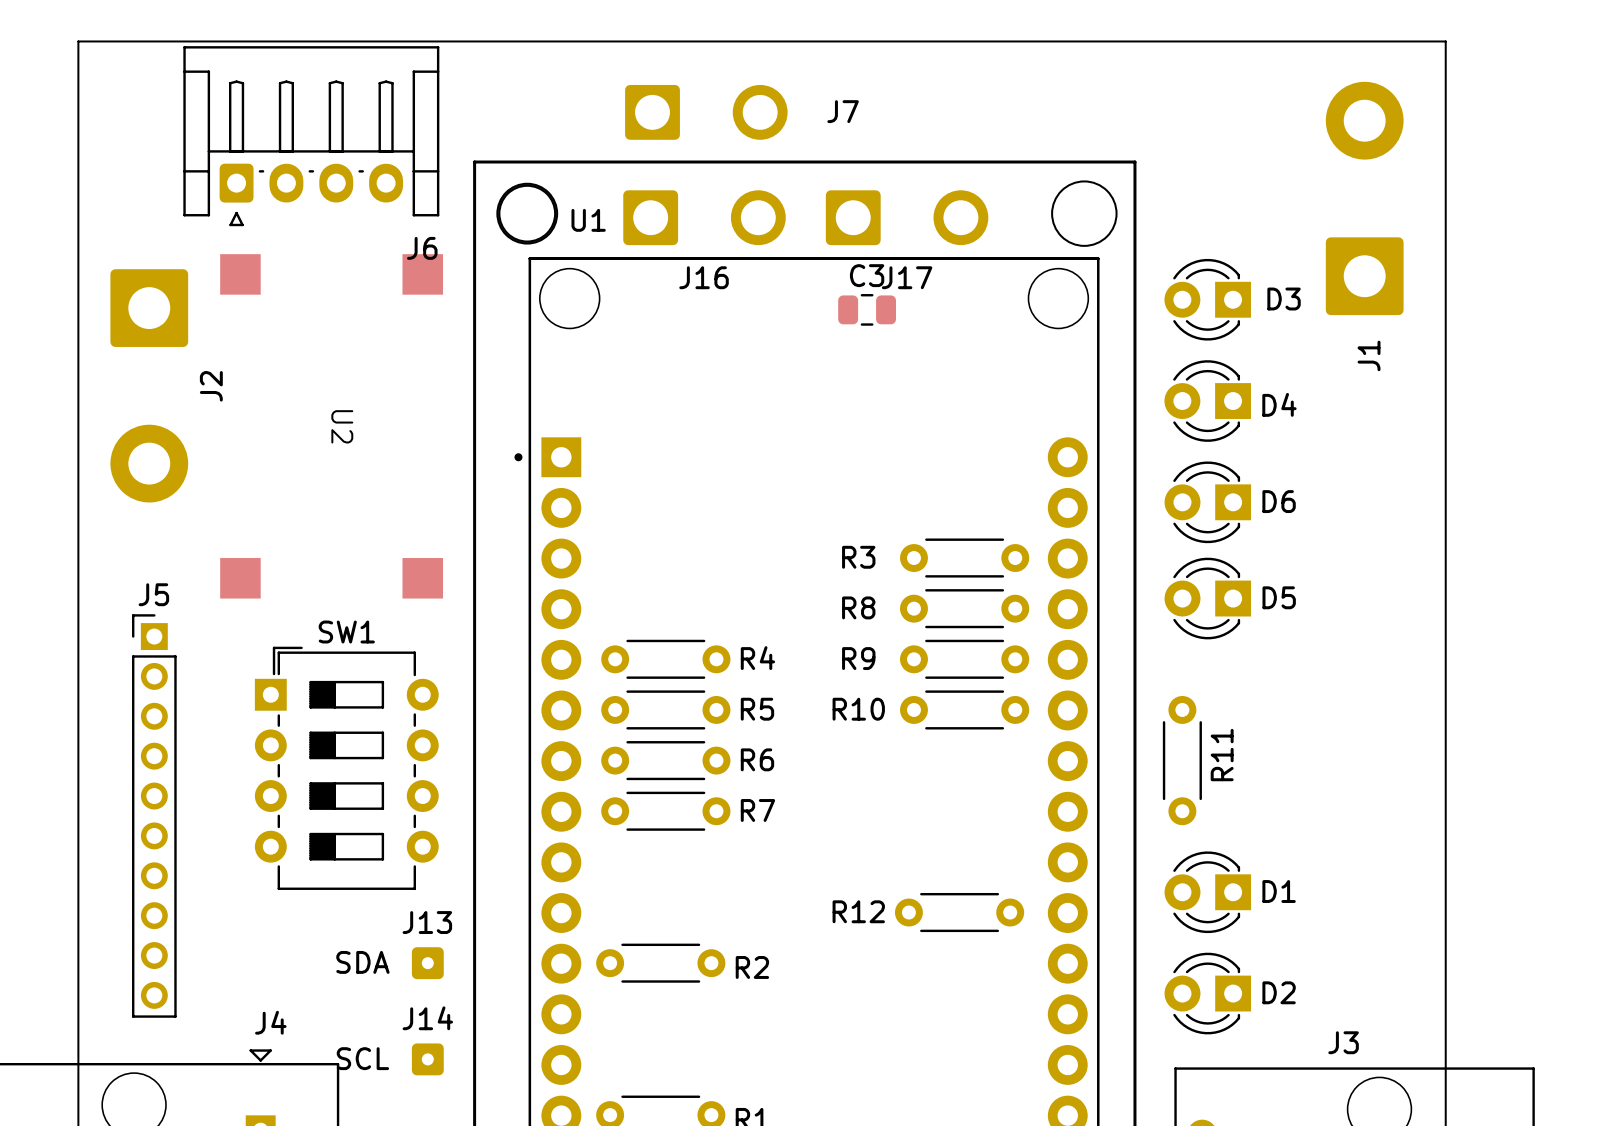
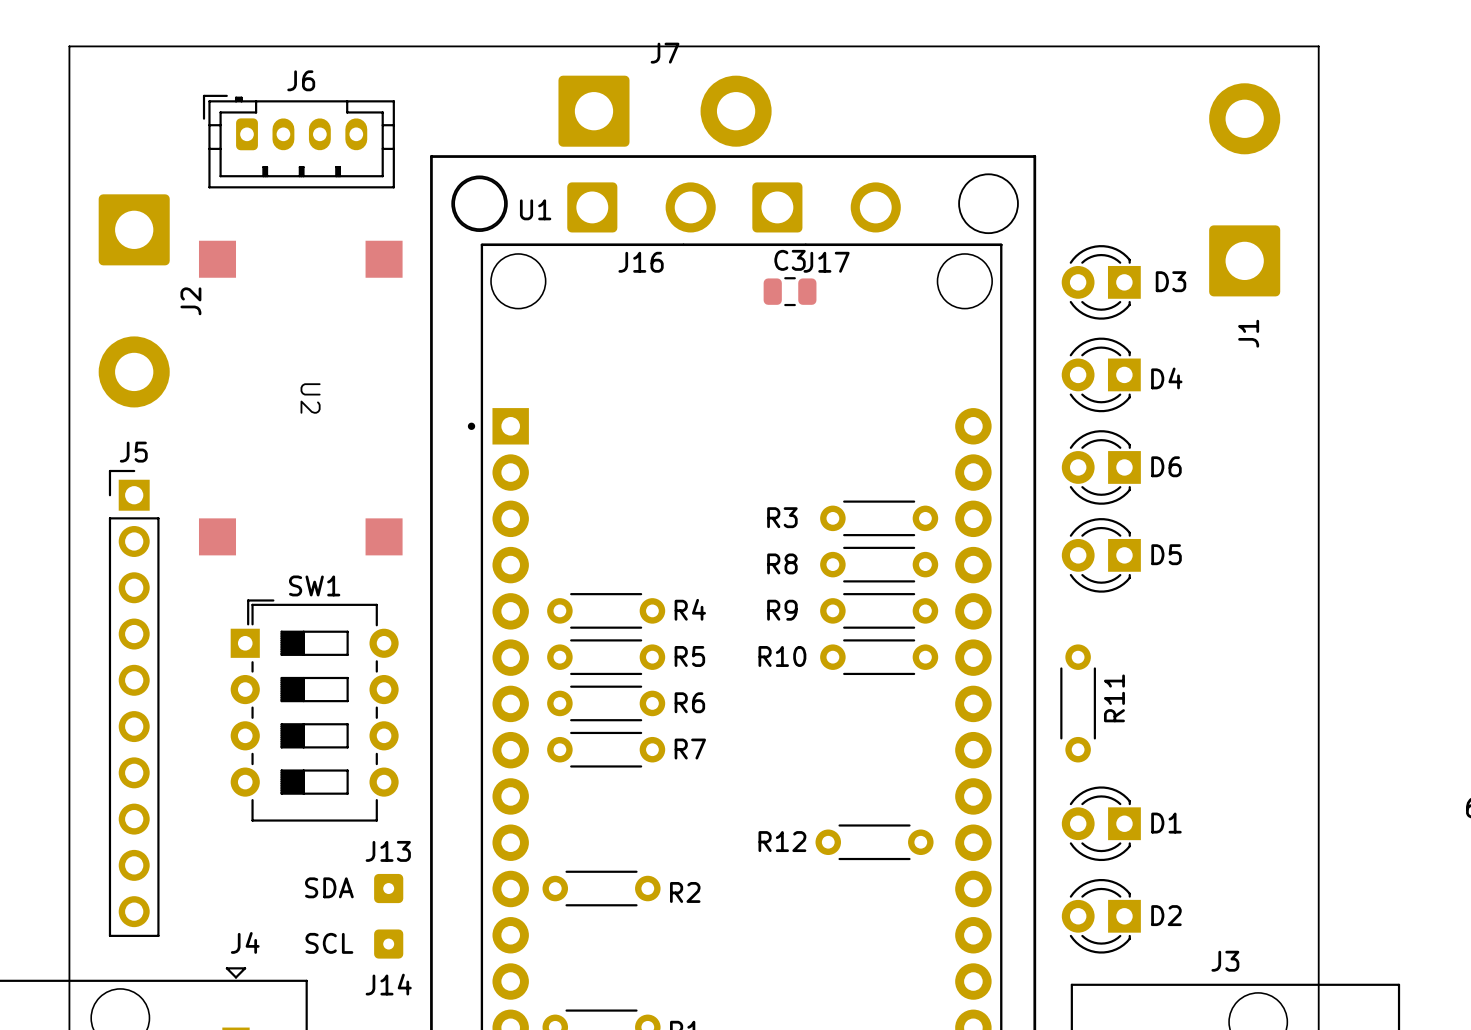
J6 footprint: [183, 46, 440, 227] -> [202, 94, 395, 189]
J7 footprint: [625, 84, 788, 140] -> [558, 75, 772, 147]
J7 name position: J7 (843, 111) -> J7 (665, 53)
J6 name position: J6 (422, 248) -> J6 (301, 80)
J2 position: (149, 385) -> (134, 300)
J5 name position: J5 (153, 594) -> J5 (133, 452)
J5 footprint: [132, 614, 177, 1018] -> [108, 469, 160, 937]
J14 name position: J14 (427, 1018) -> J14 (388, 984)
J14 position: (427, 1059) -> (388, 944)

